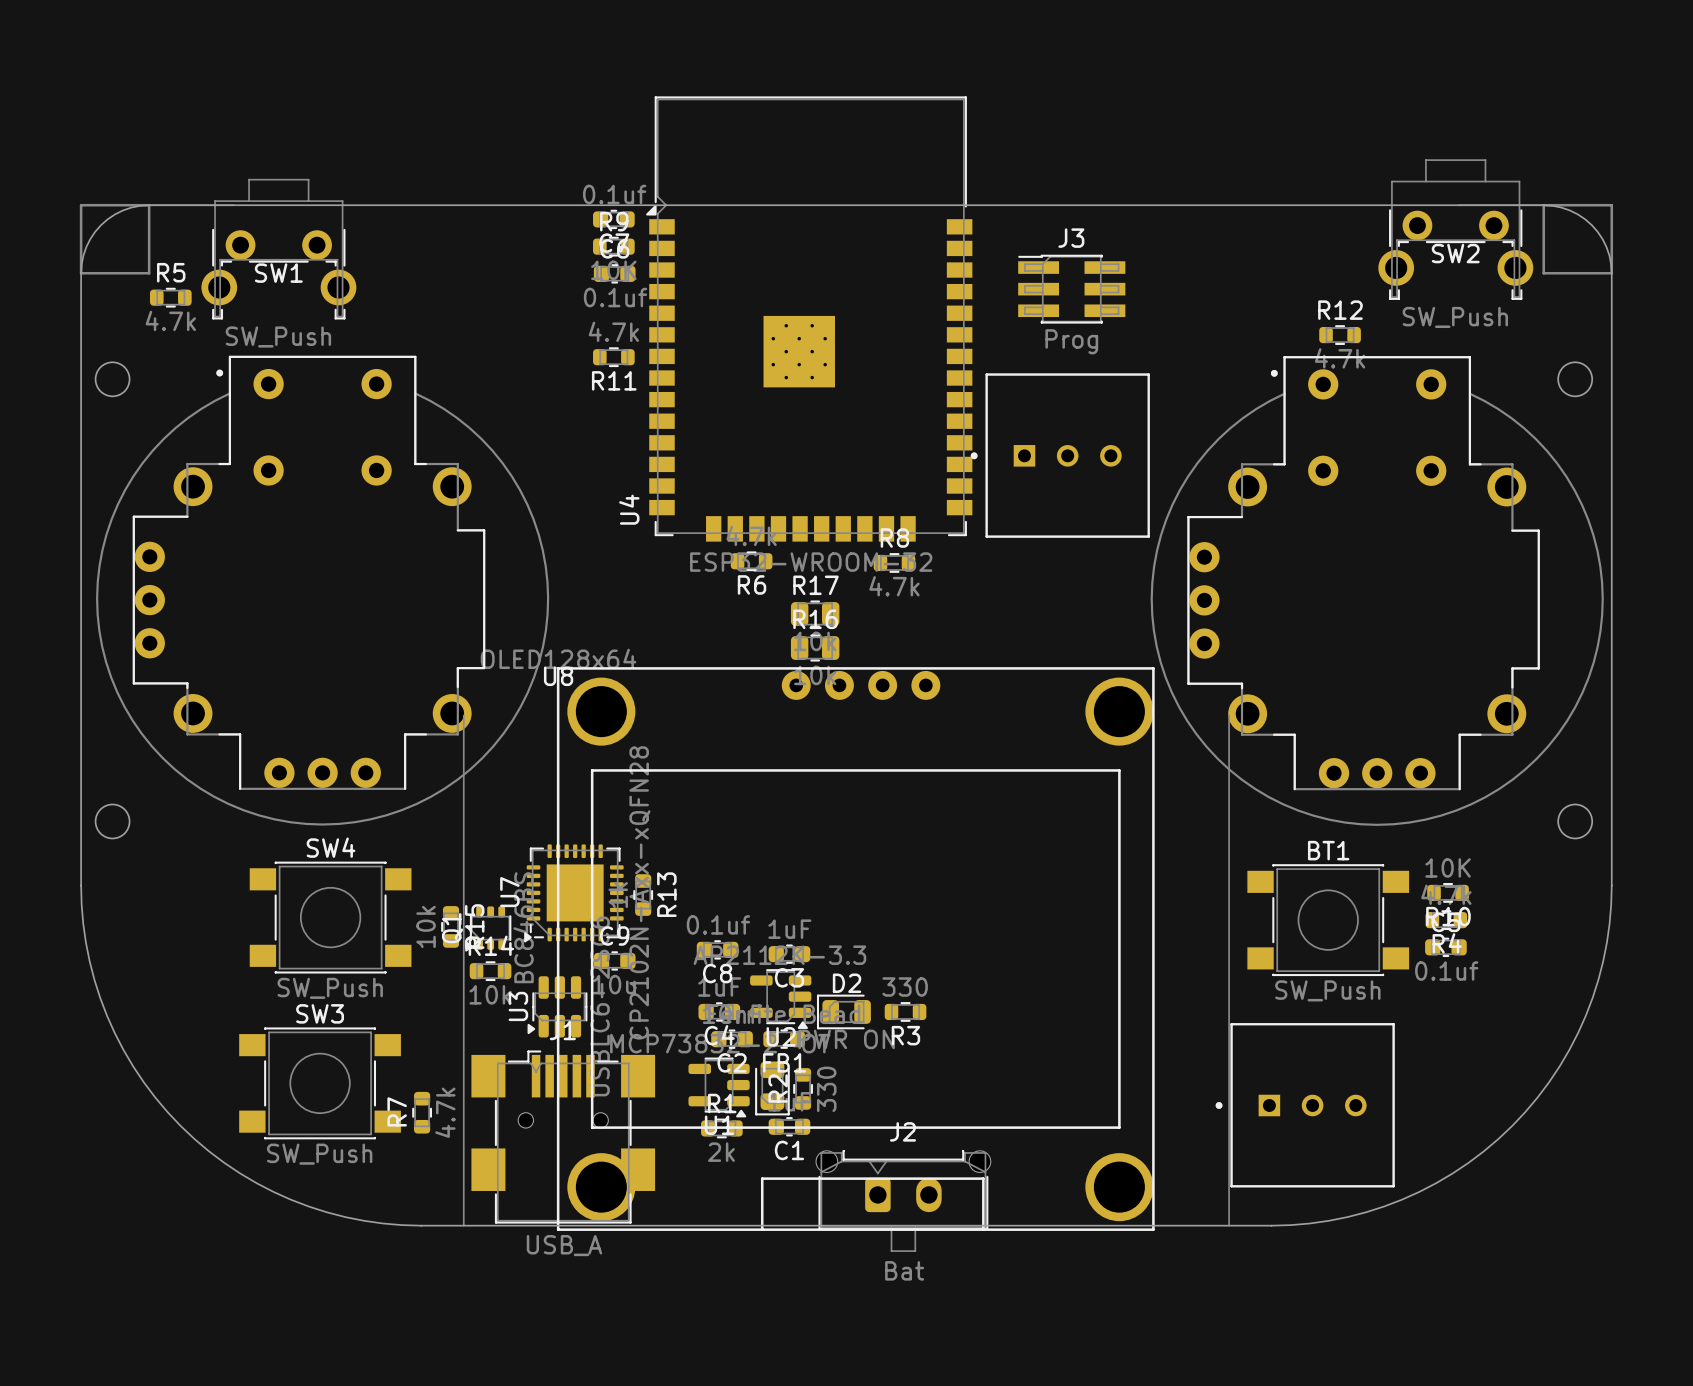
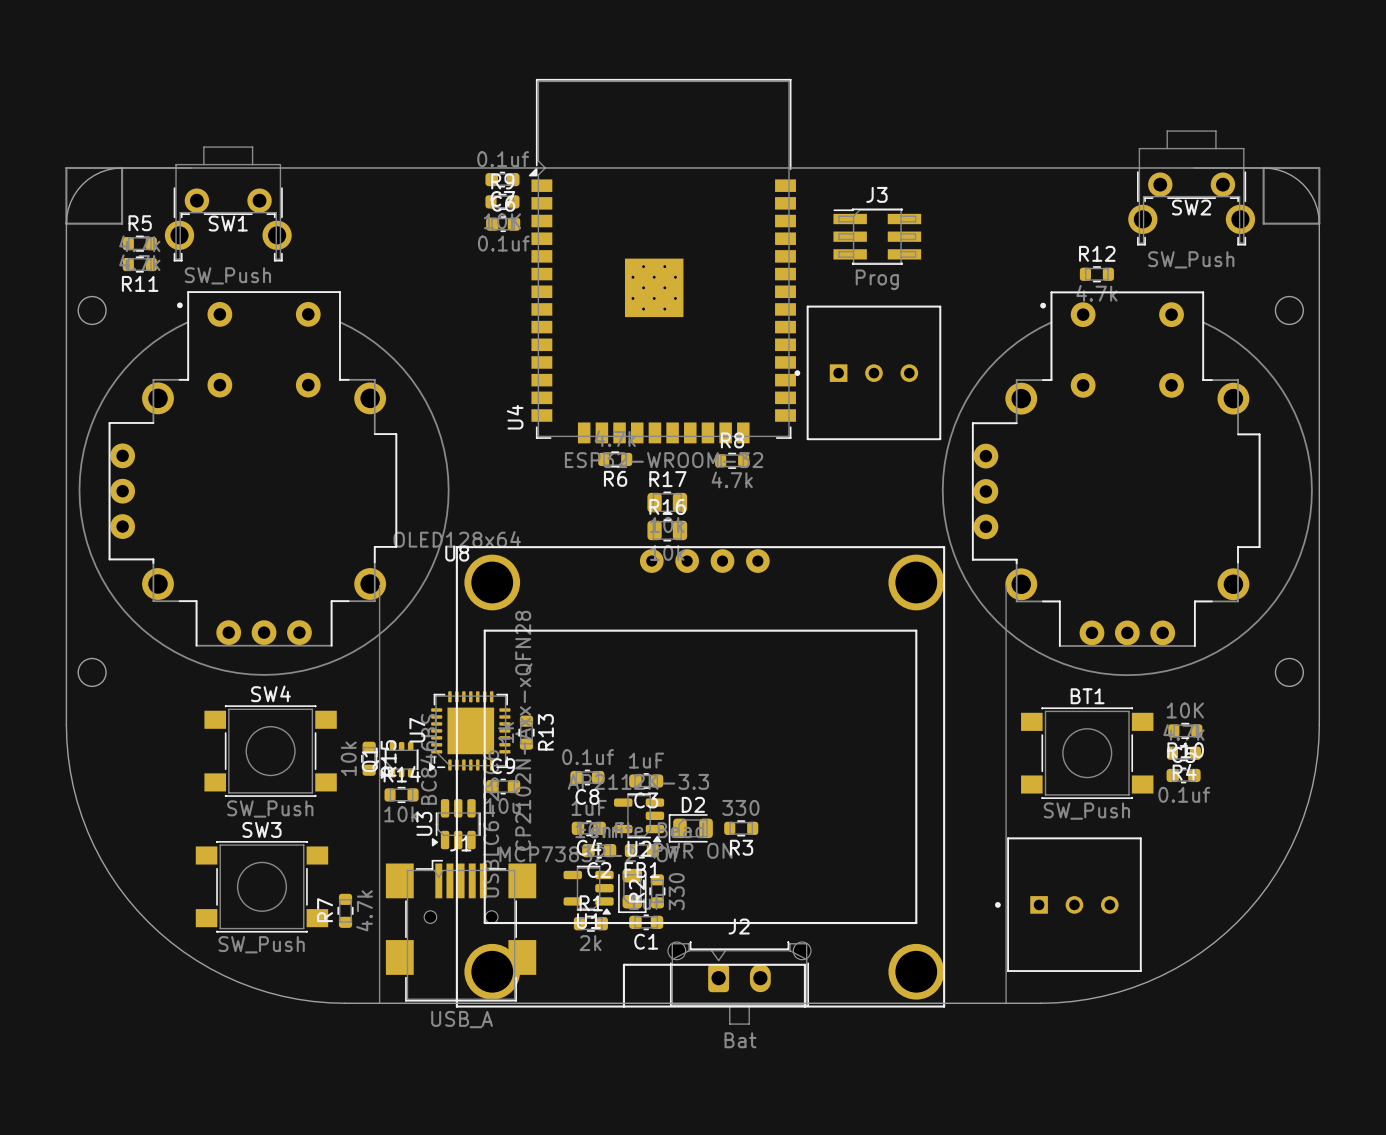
R11 position: (613, 357) -> (139, 264)

